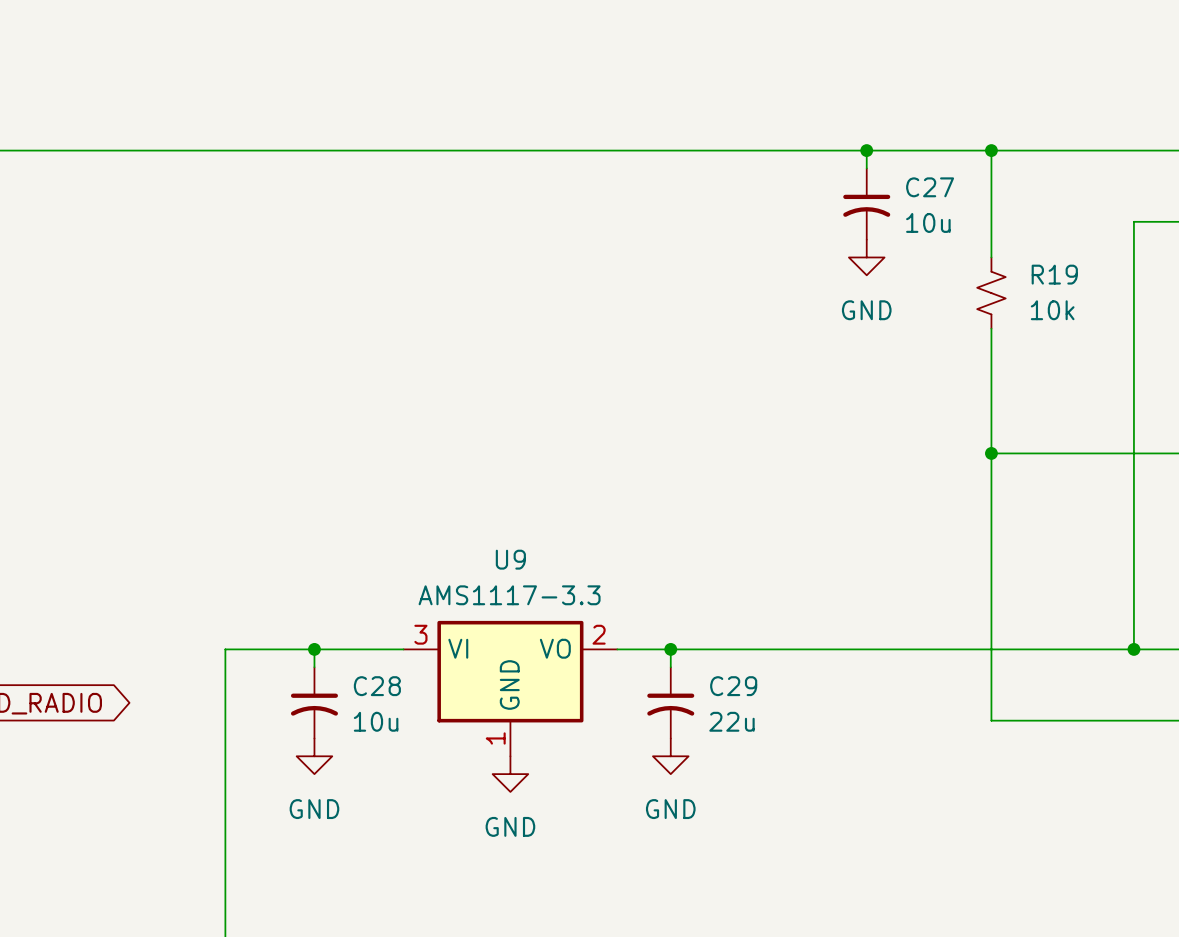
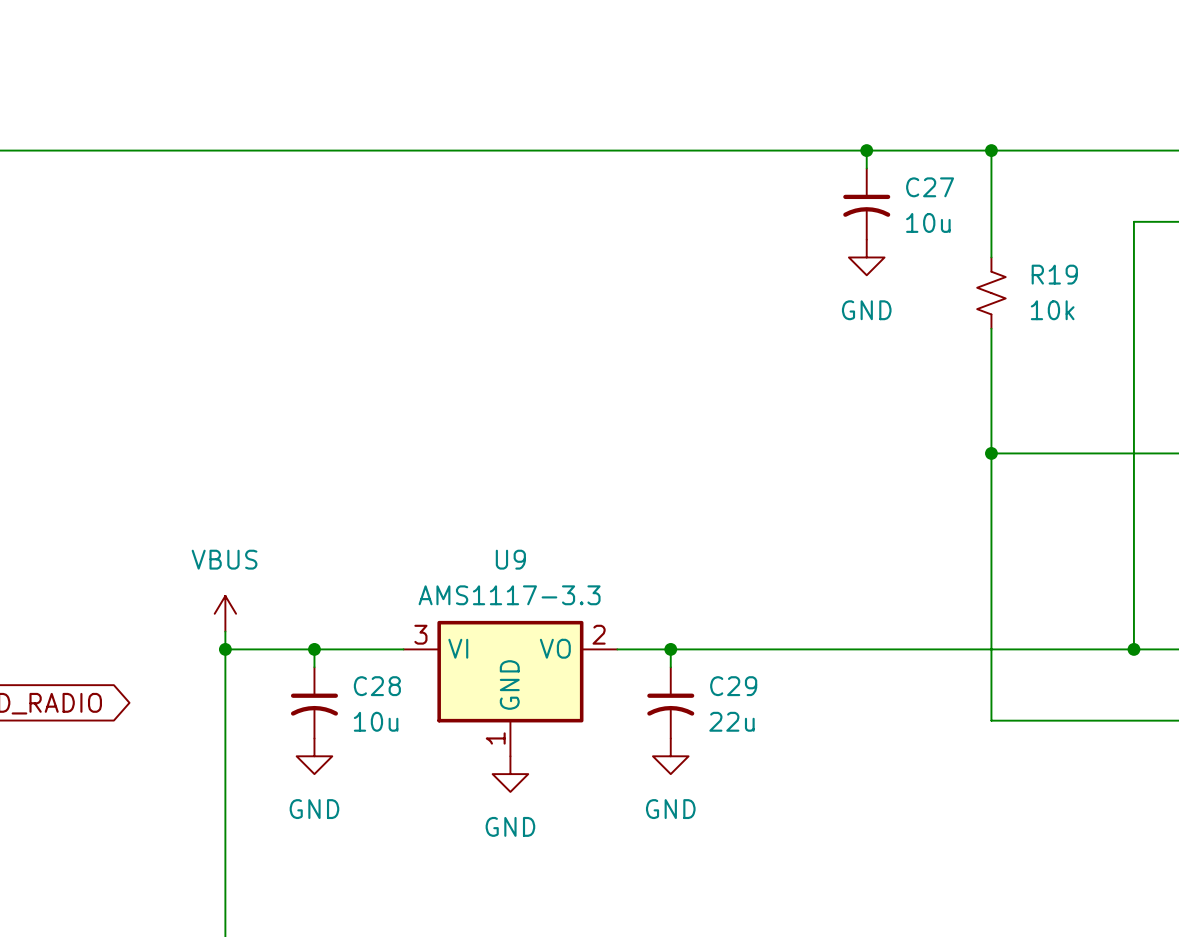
power symbol: none -> VBUS (225, 613)
wire: none -> (225, 631) (225, 649)
junction: none -> (225, 649)

